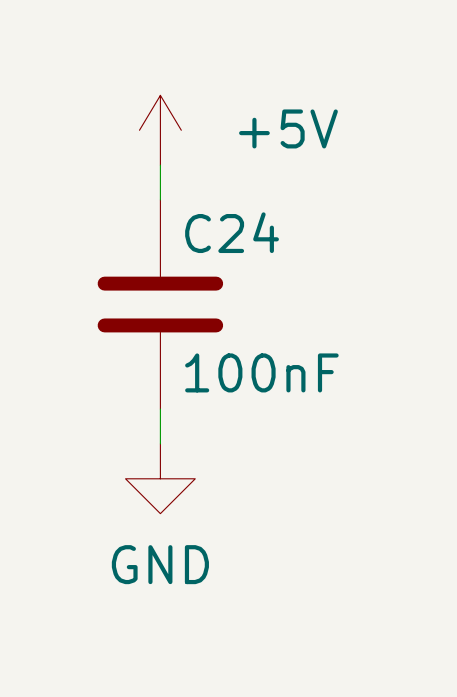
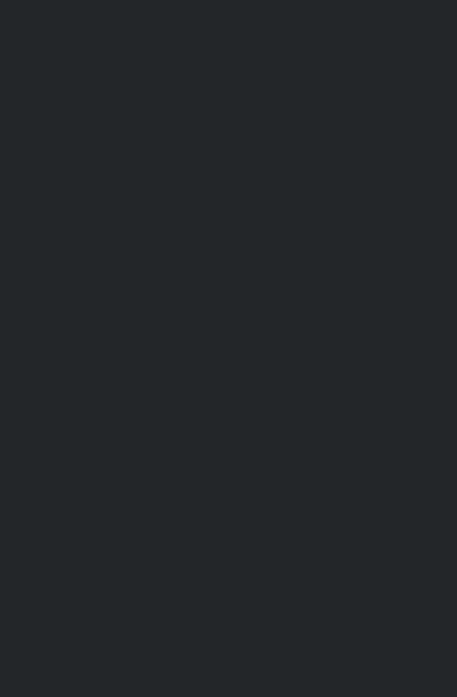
power symbol: +5V (160, 130) -> none
wire: (160, 165) (160, 199) -> none
C24: 100nF (160, 304) -> none
wire: (160, 409) (160, 443) -> none
power symbol: GND (160, 478) -> none

